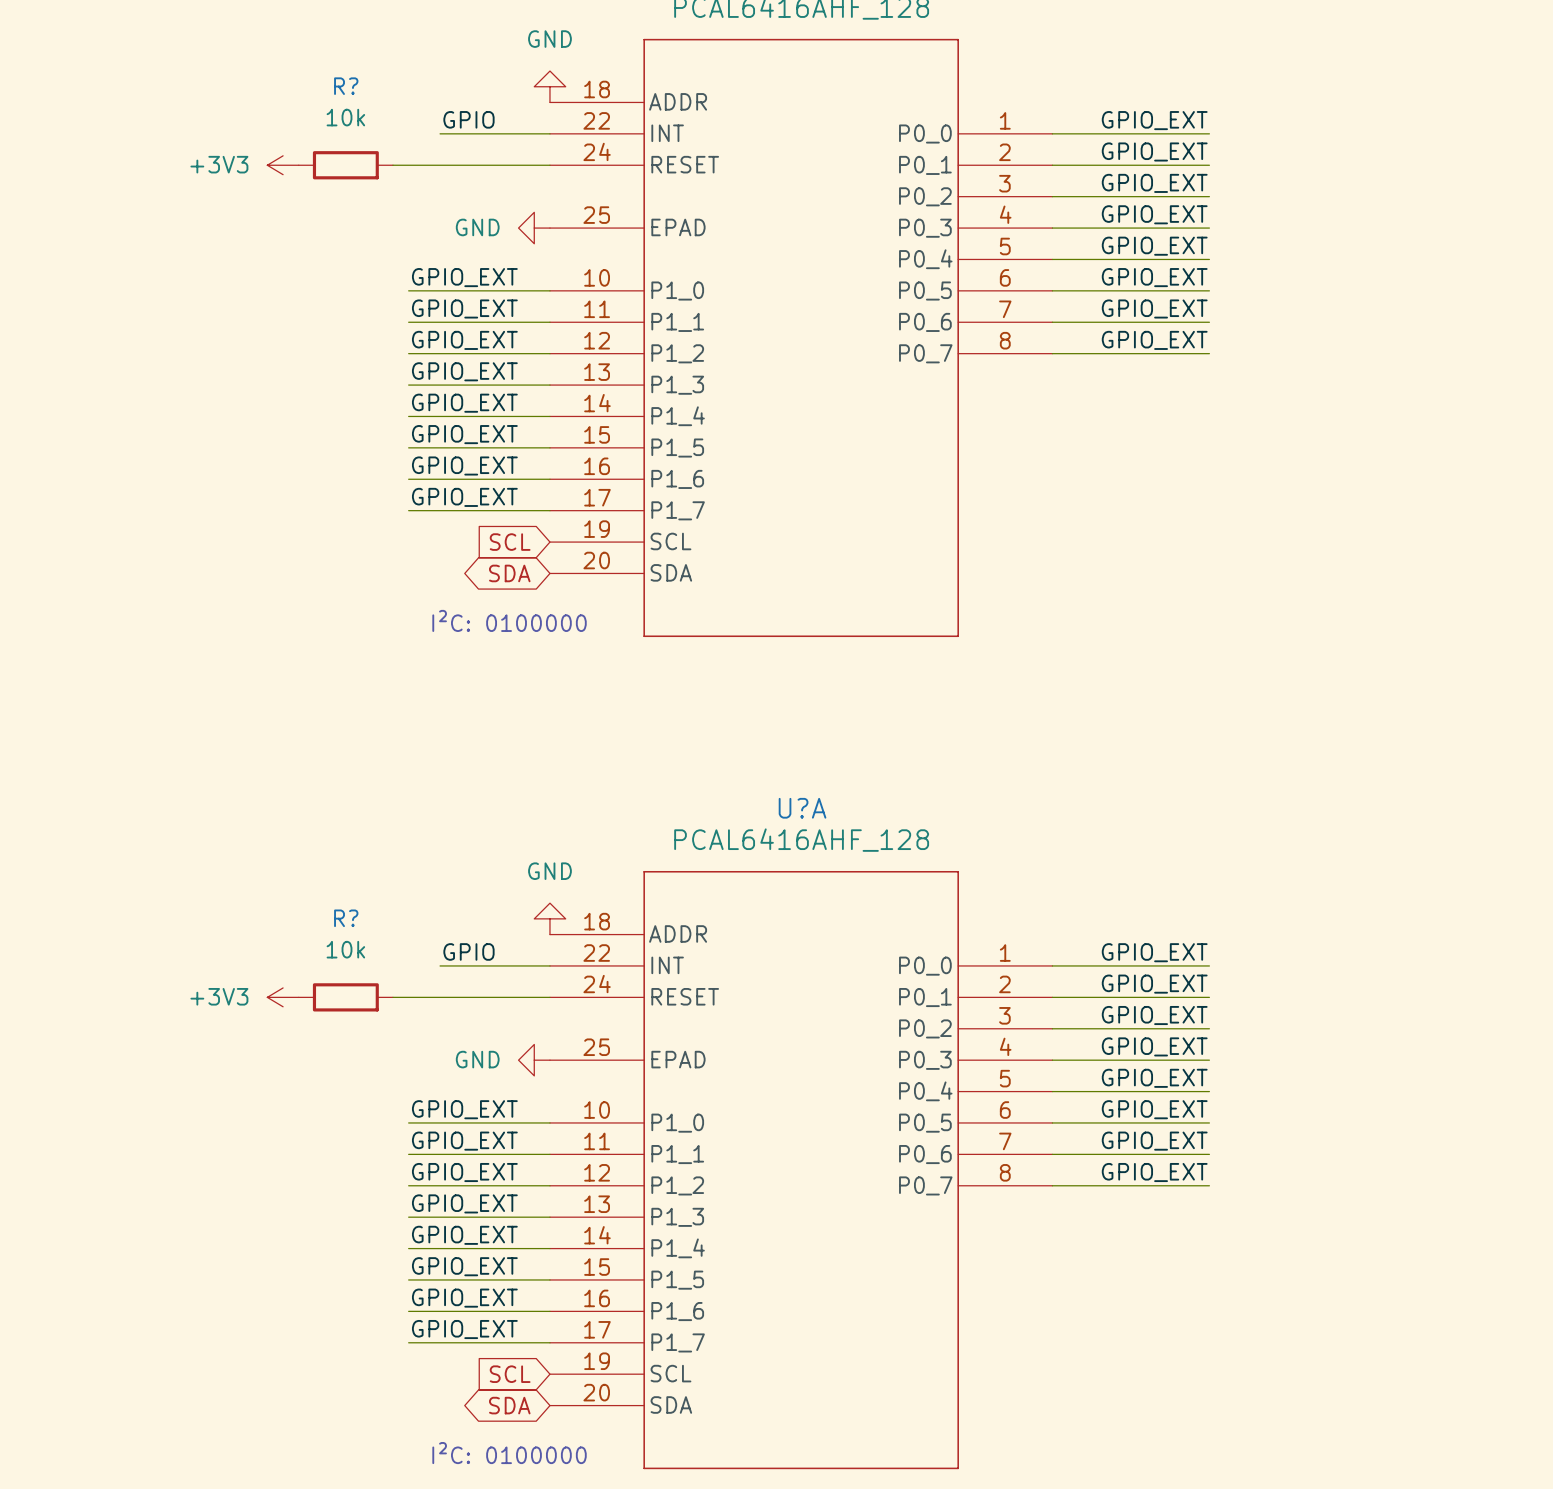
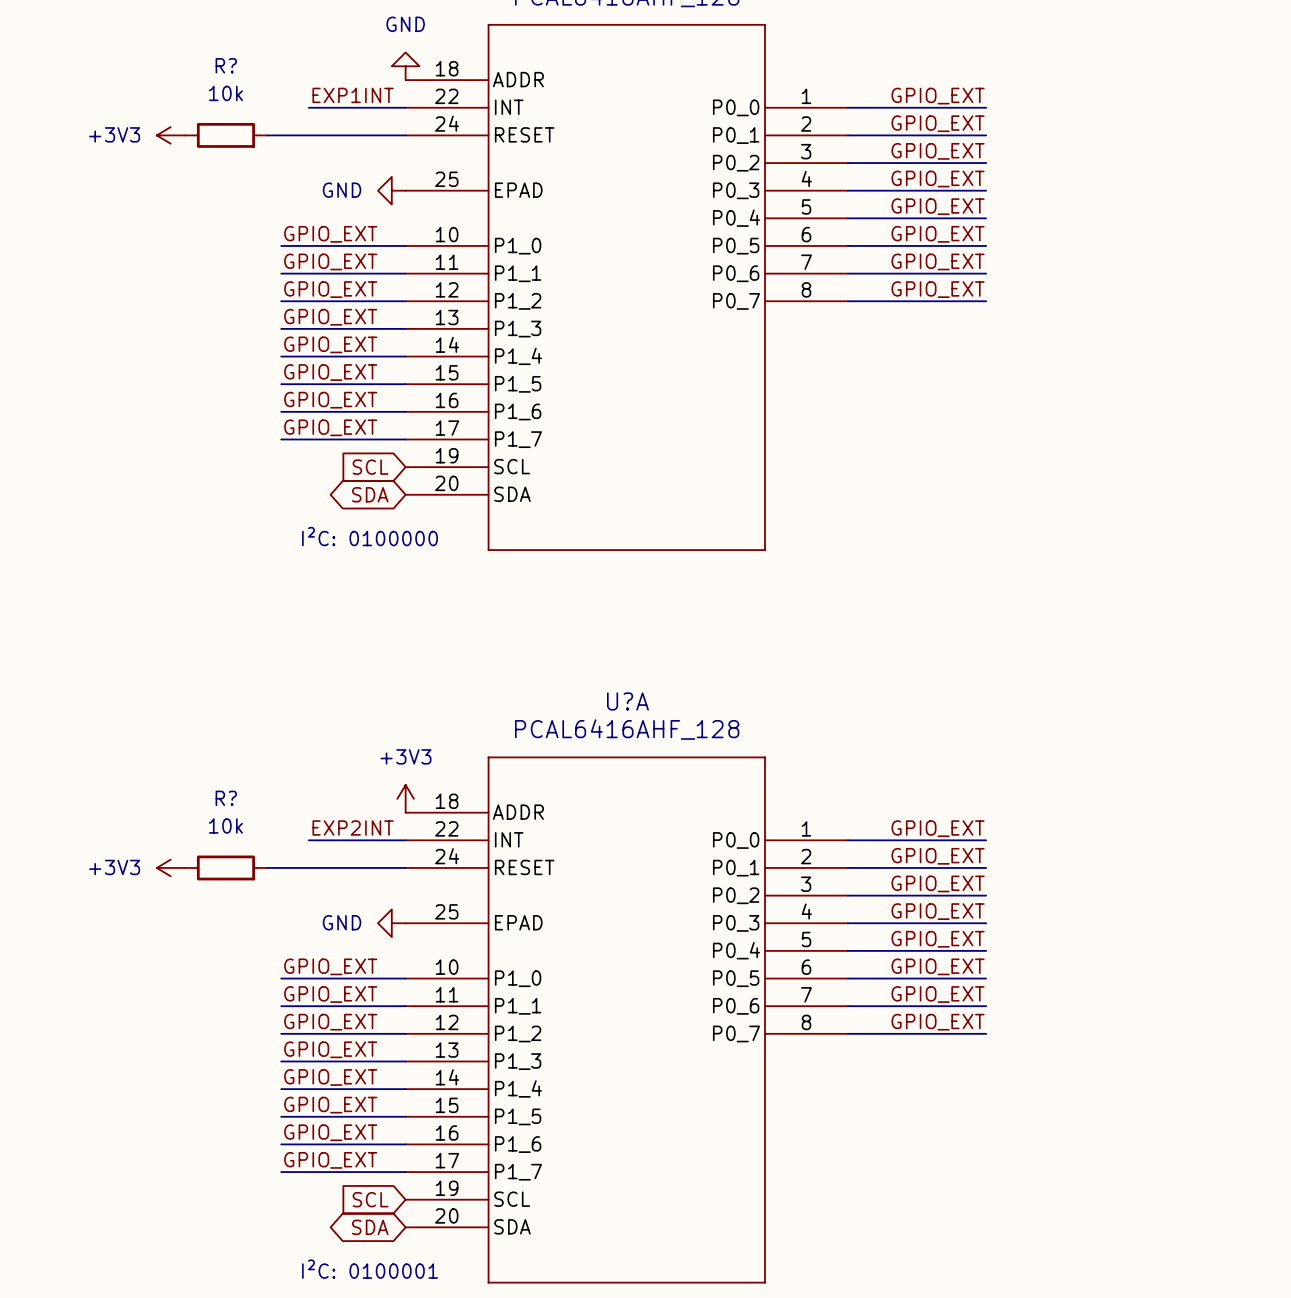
label: GPIO (468, 119) -> EXP1INT (353, 95)
power symbol: GND (549, 918) -> +3V3 (405, 798)
label: GPIO (468, 951) -> EXP2INT (353, 827)
text: I²C: 0100000 (509, 1453) -> I²C: 0100001 (370, 1269)

